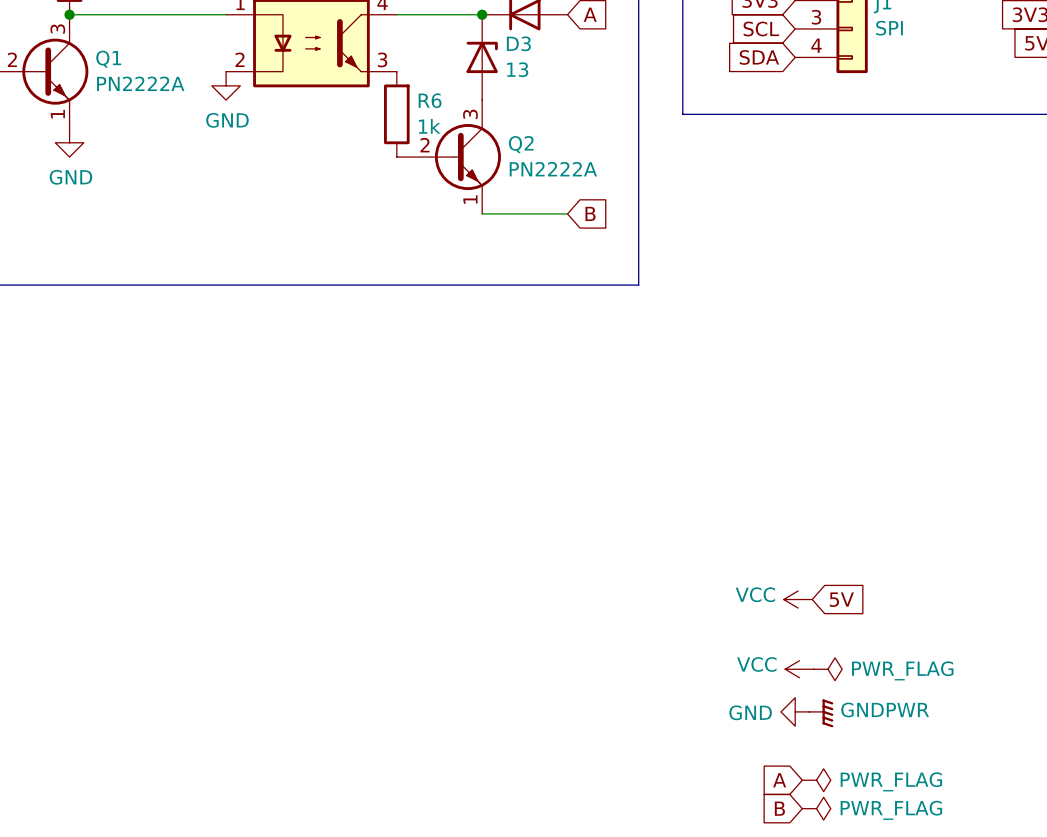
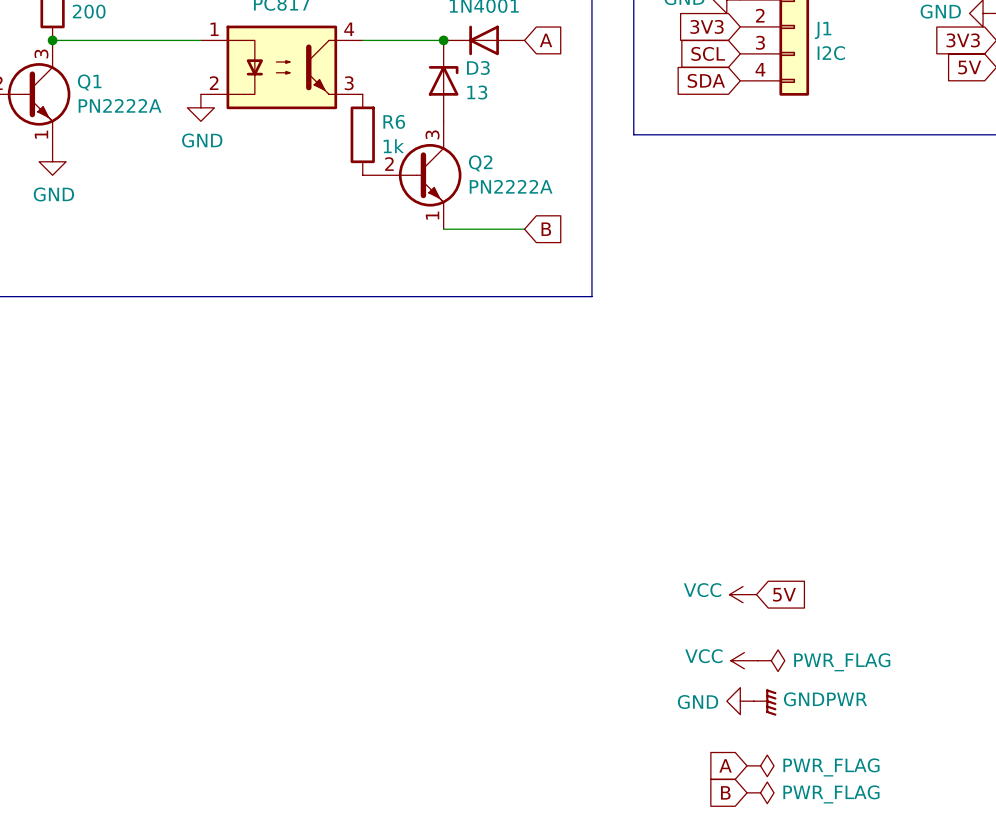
J1 value: SPI (889, 28) -> I2C (831, 53)

